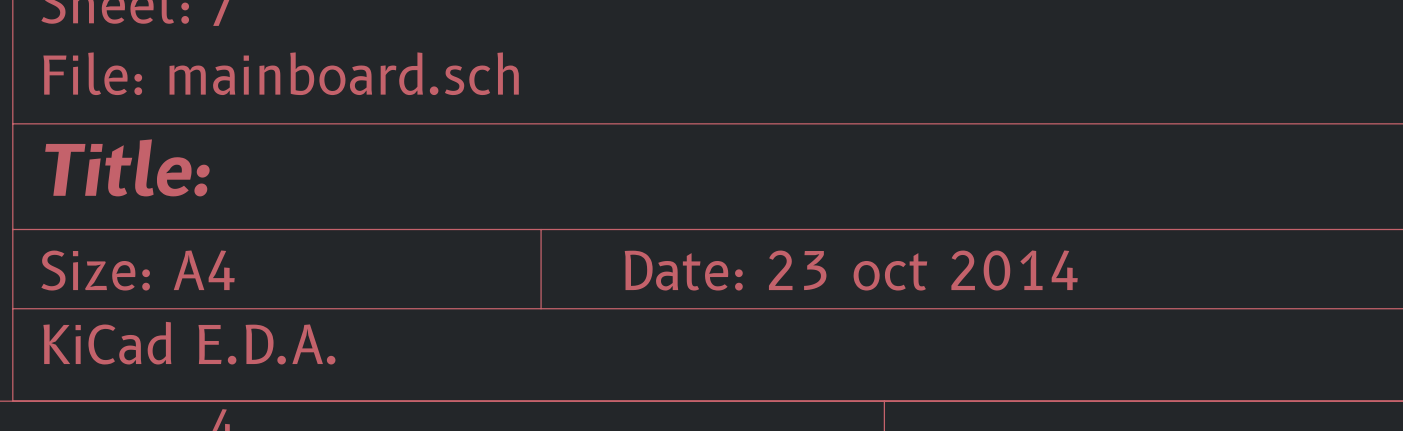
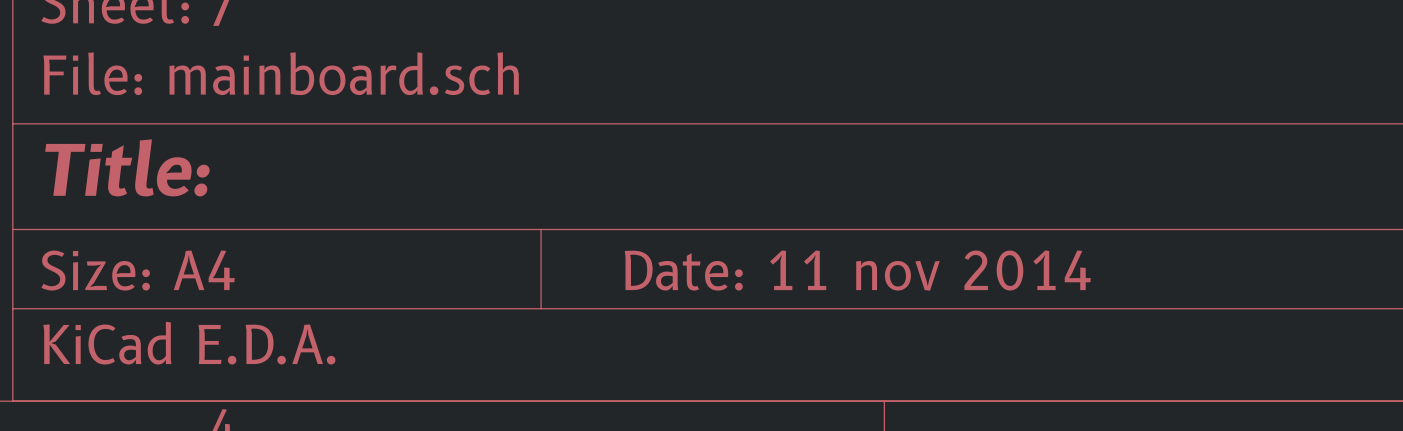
title block: Date: 23 oct 2014 (851, 270) -> Date: 11 nov 2014 (857, 270)

